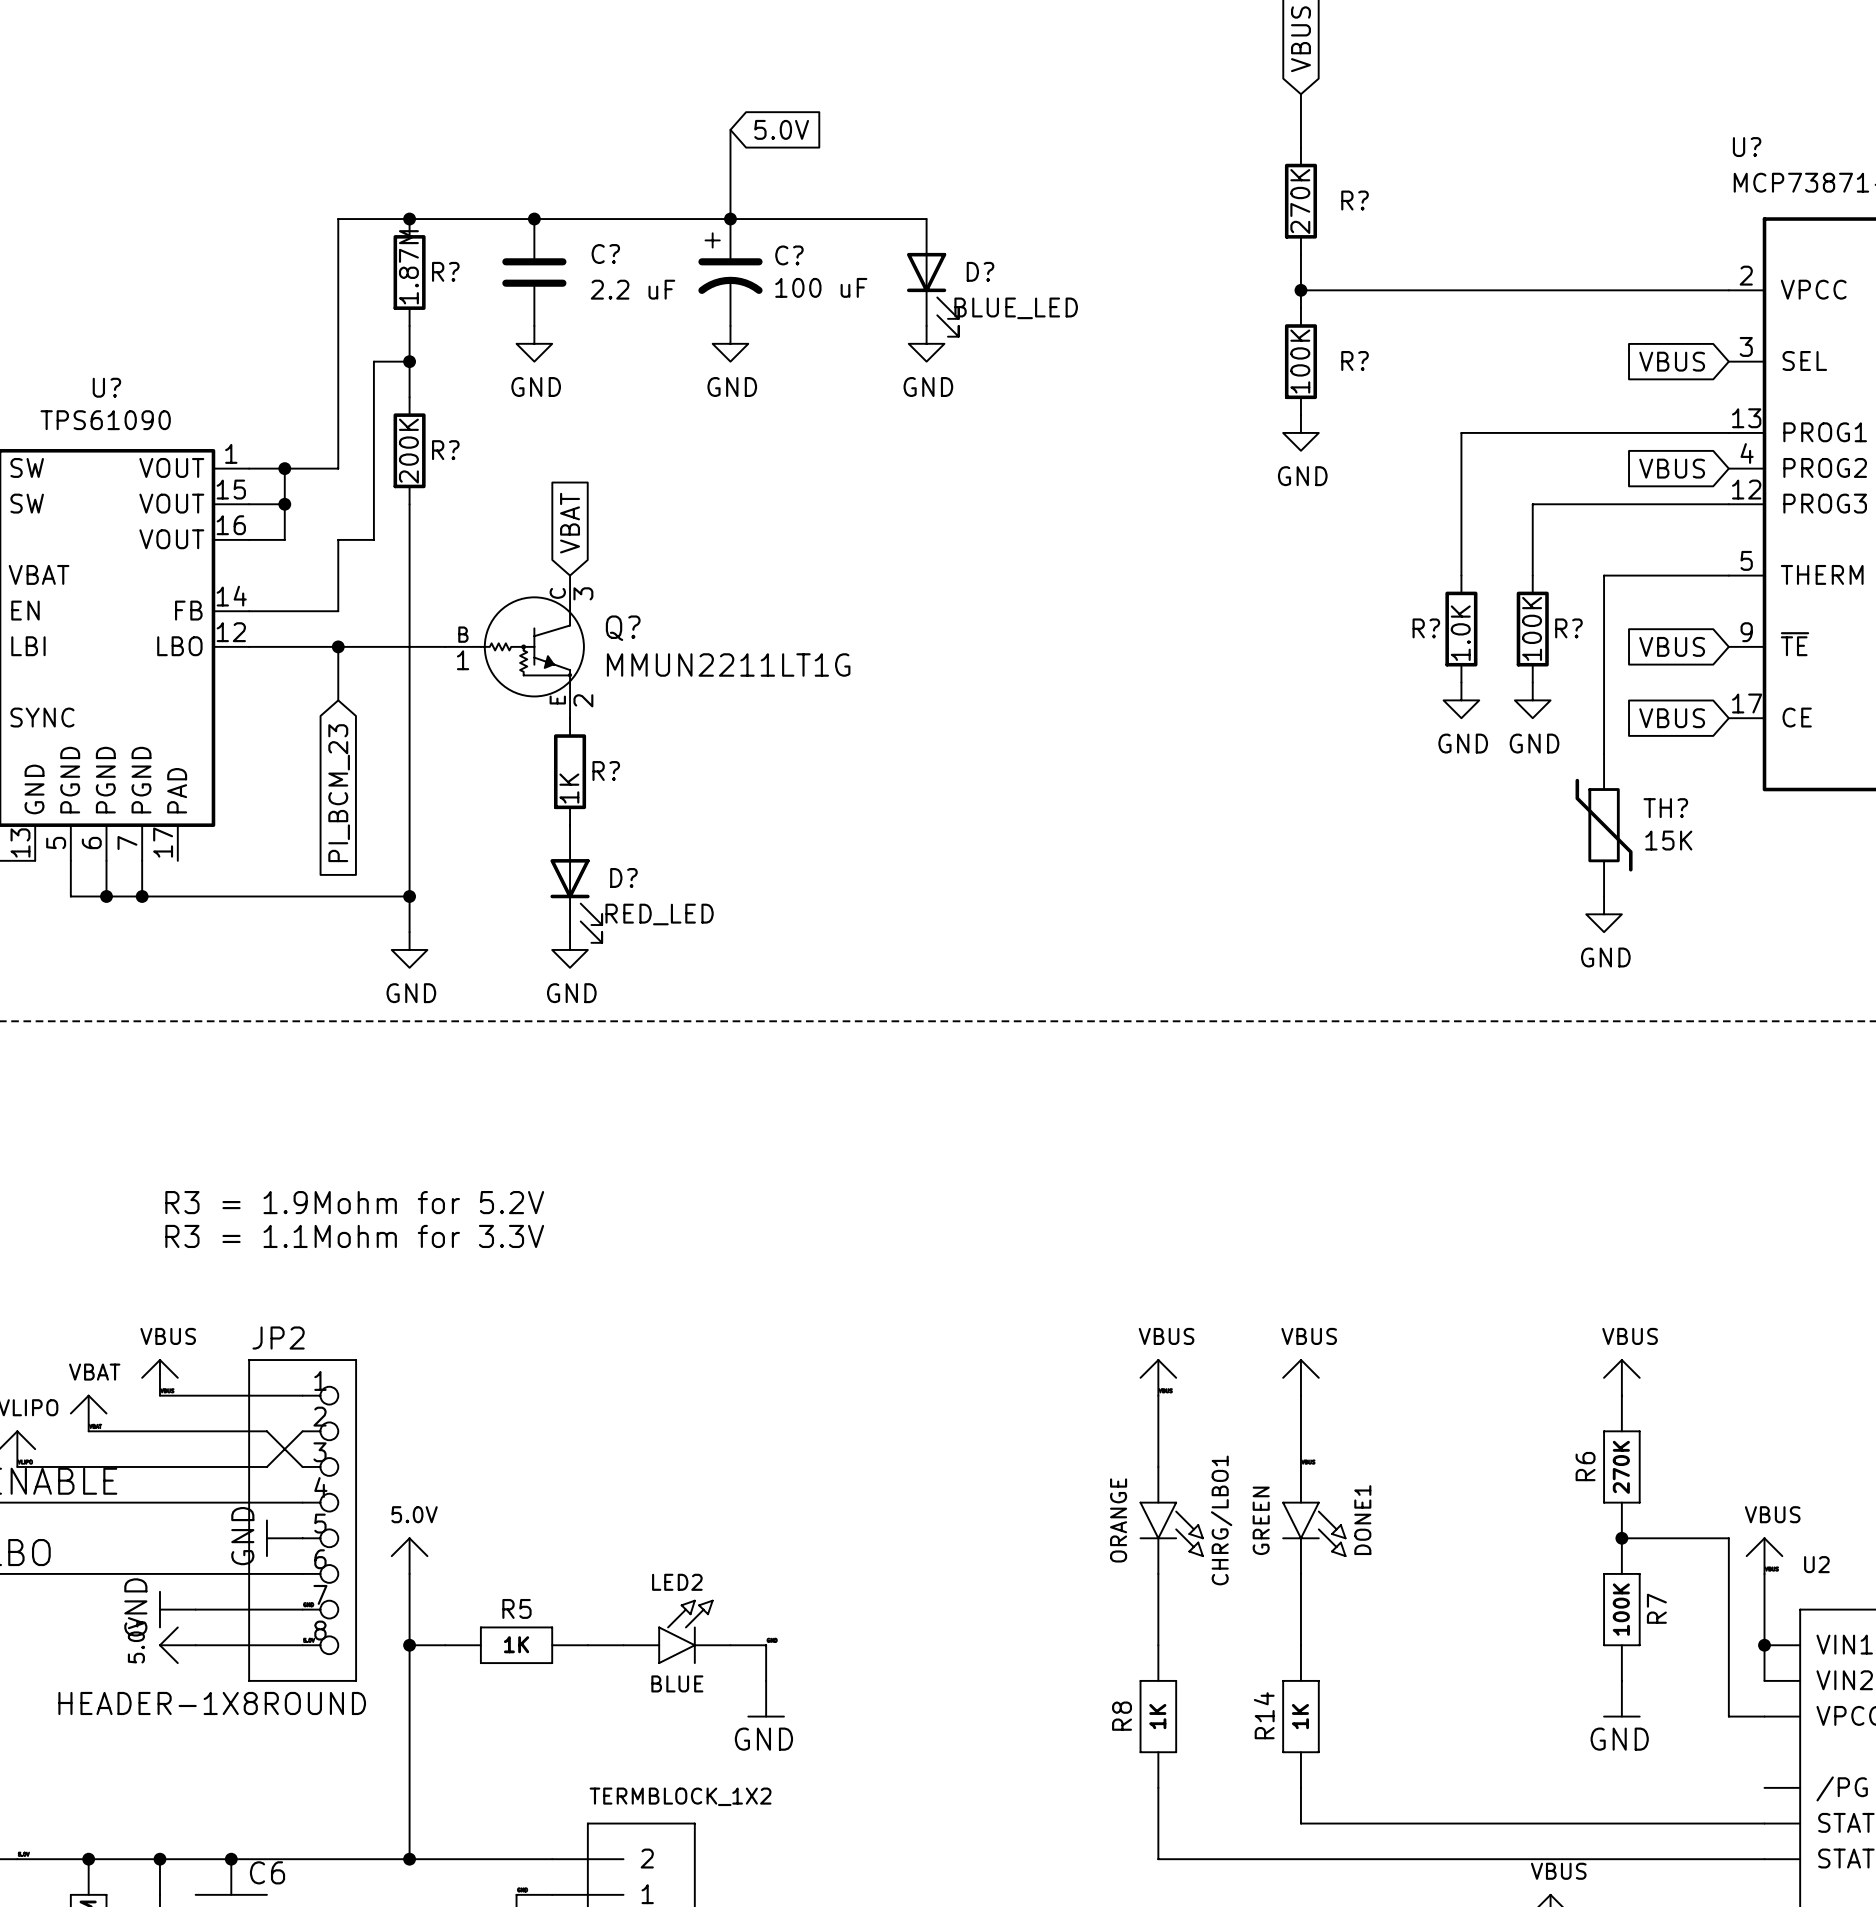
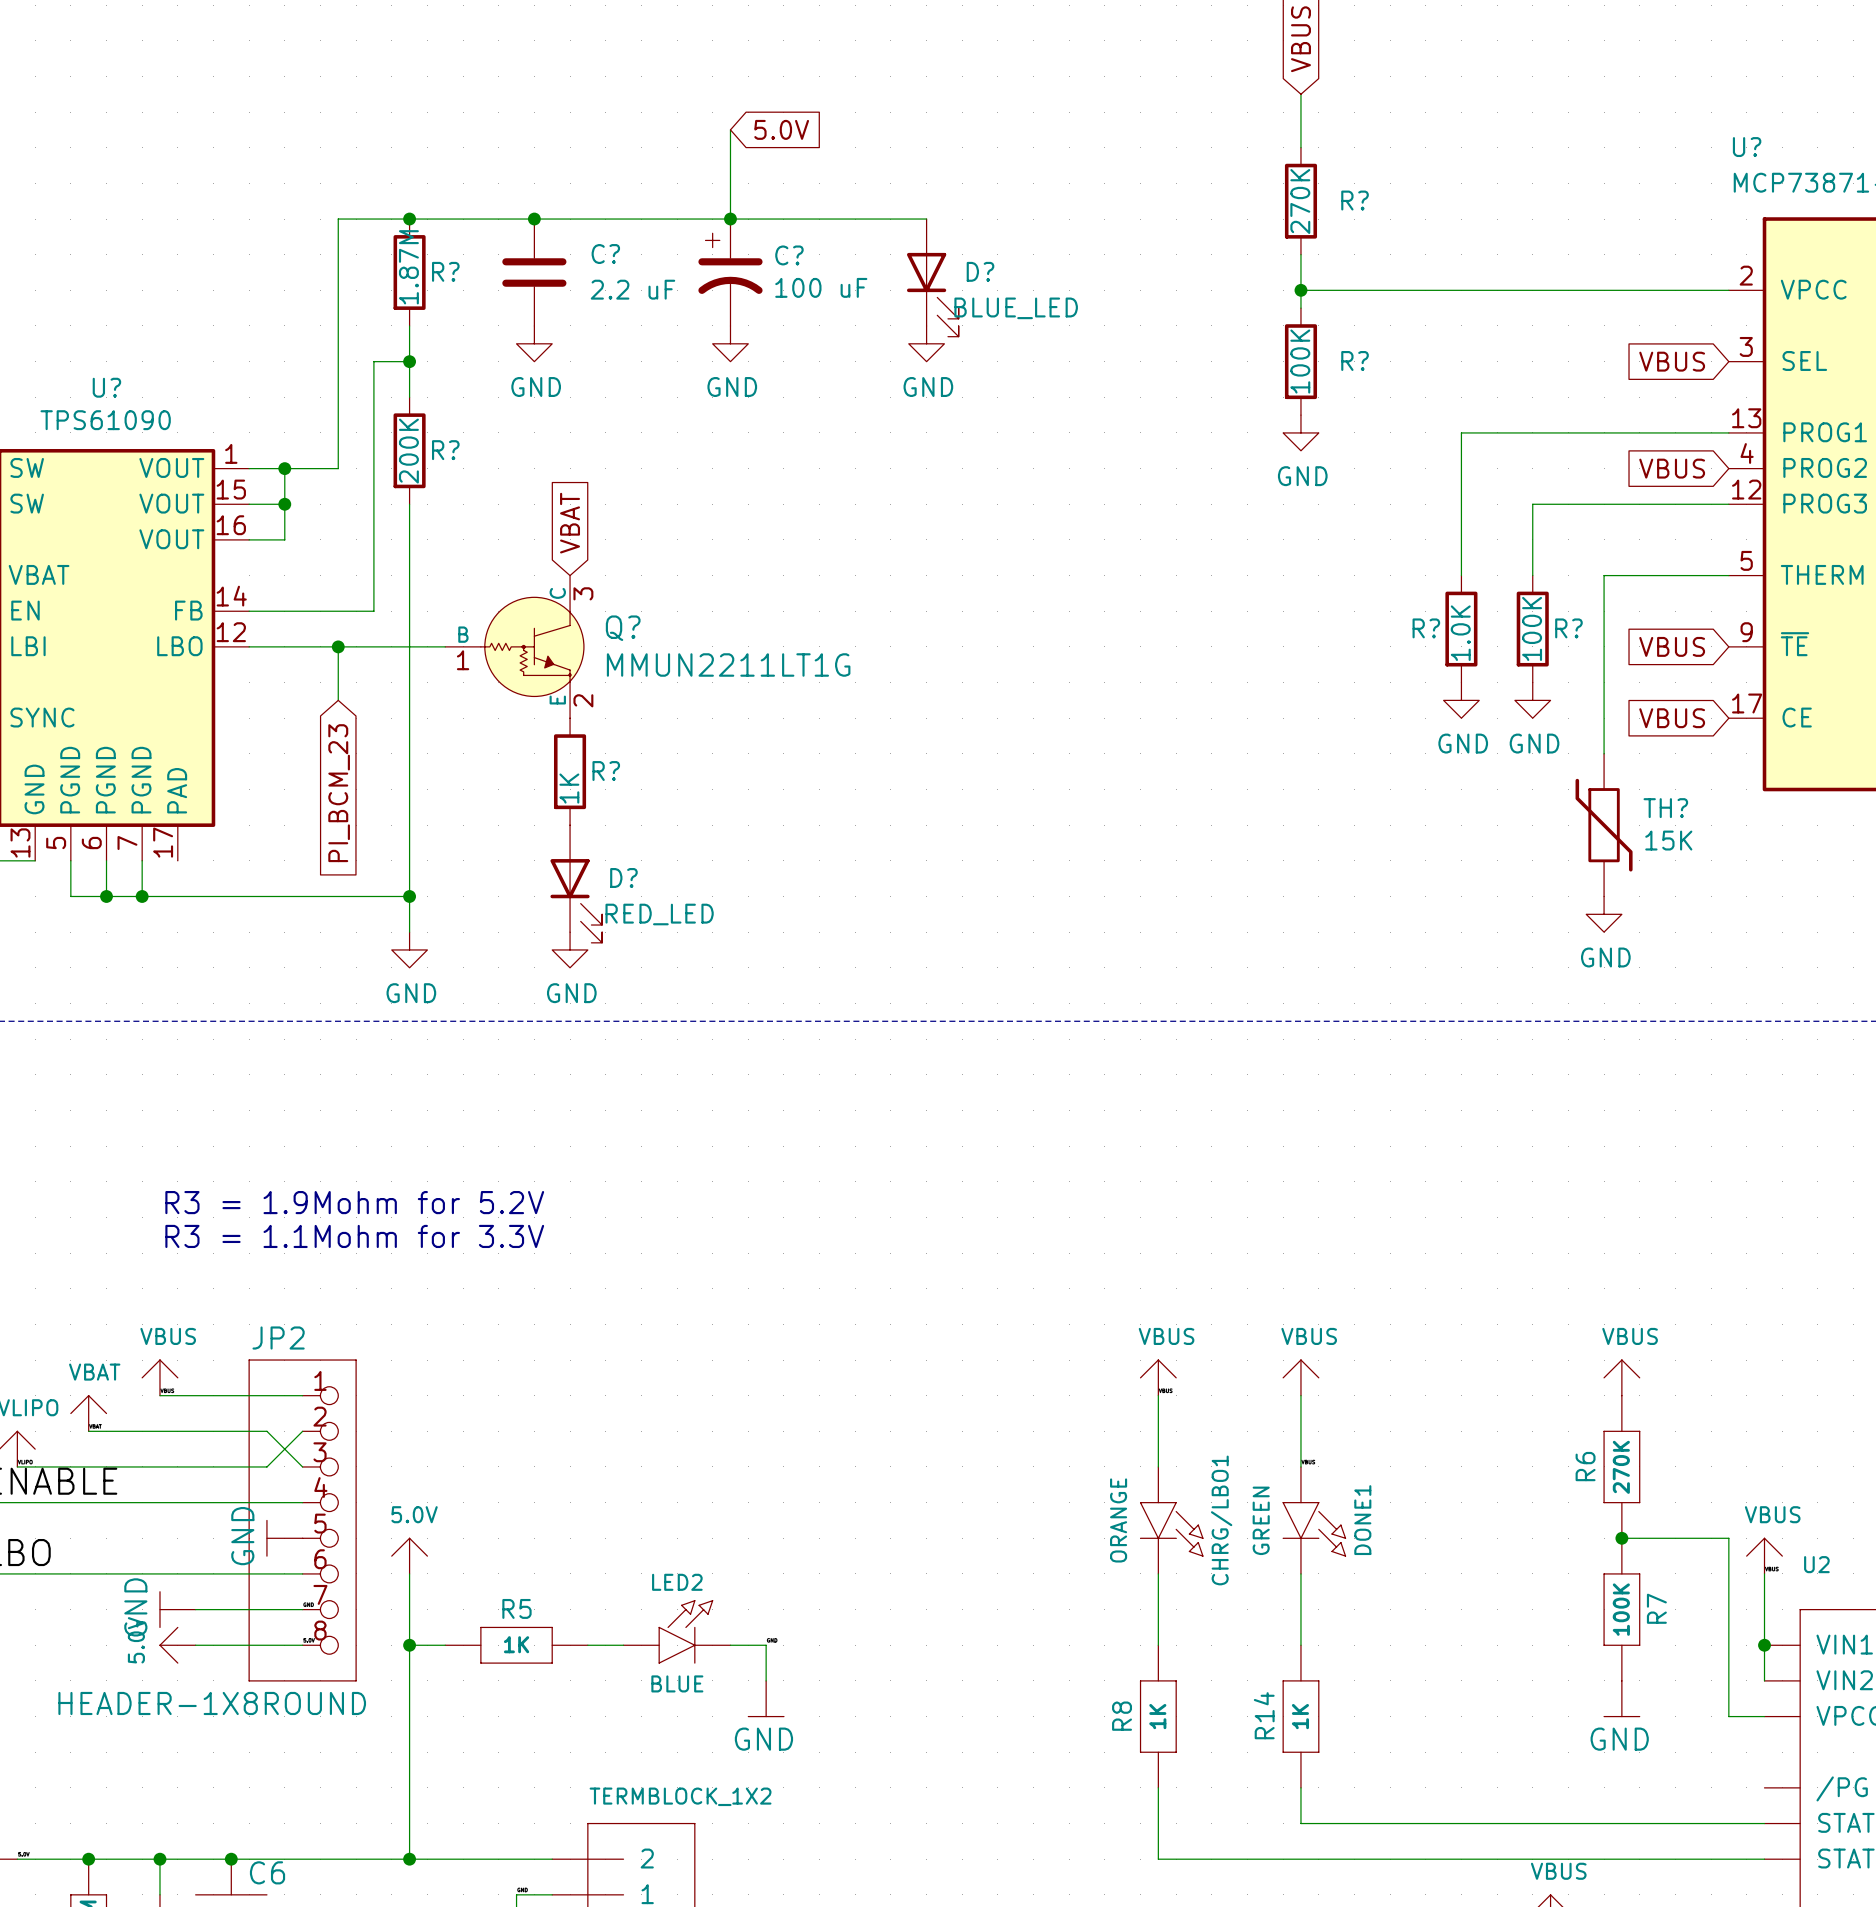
wire: (373, 539) (338, 539) (338, 611) -> (373, 539) (373, 611) (338, 611)

